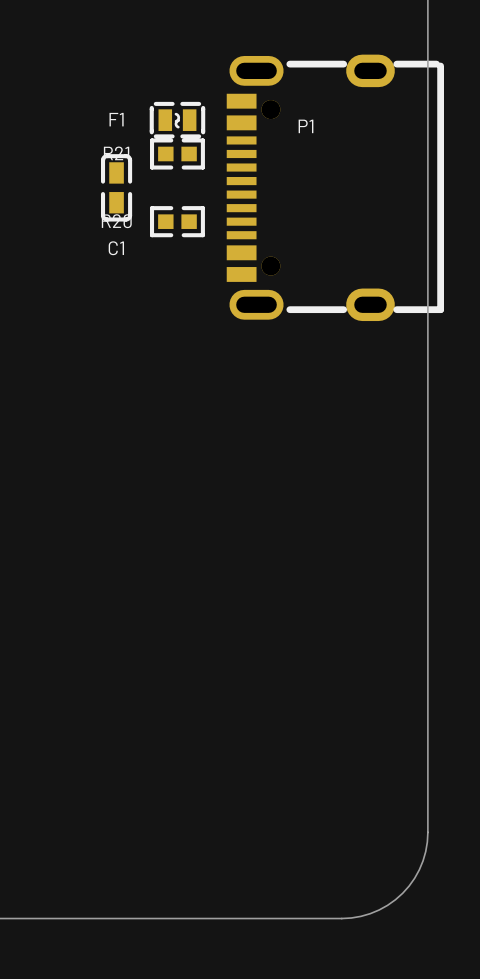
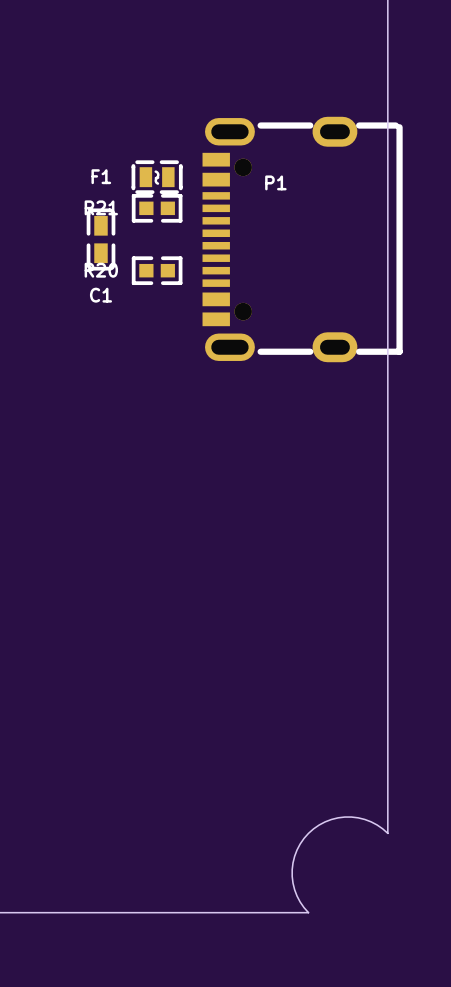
board edge: (427, 832) (425, 851) (419, 869) (402, 893) (379, 910) (360, 916) (341, 918) -> (387, 833) (371, 821) (358, 817) (344, 817) (325, 821) (308, 833) (300, 844) (294, 856) (292, 876) (297, 896) (308, 912)

